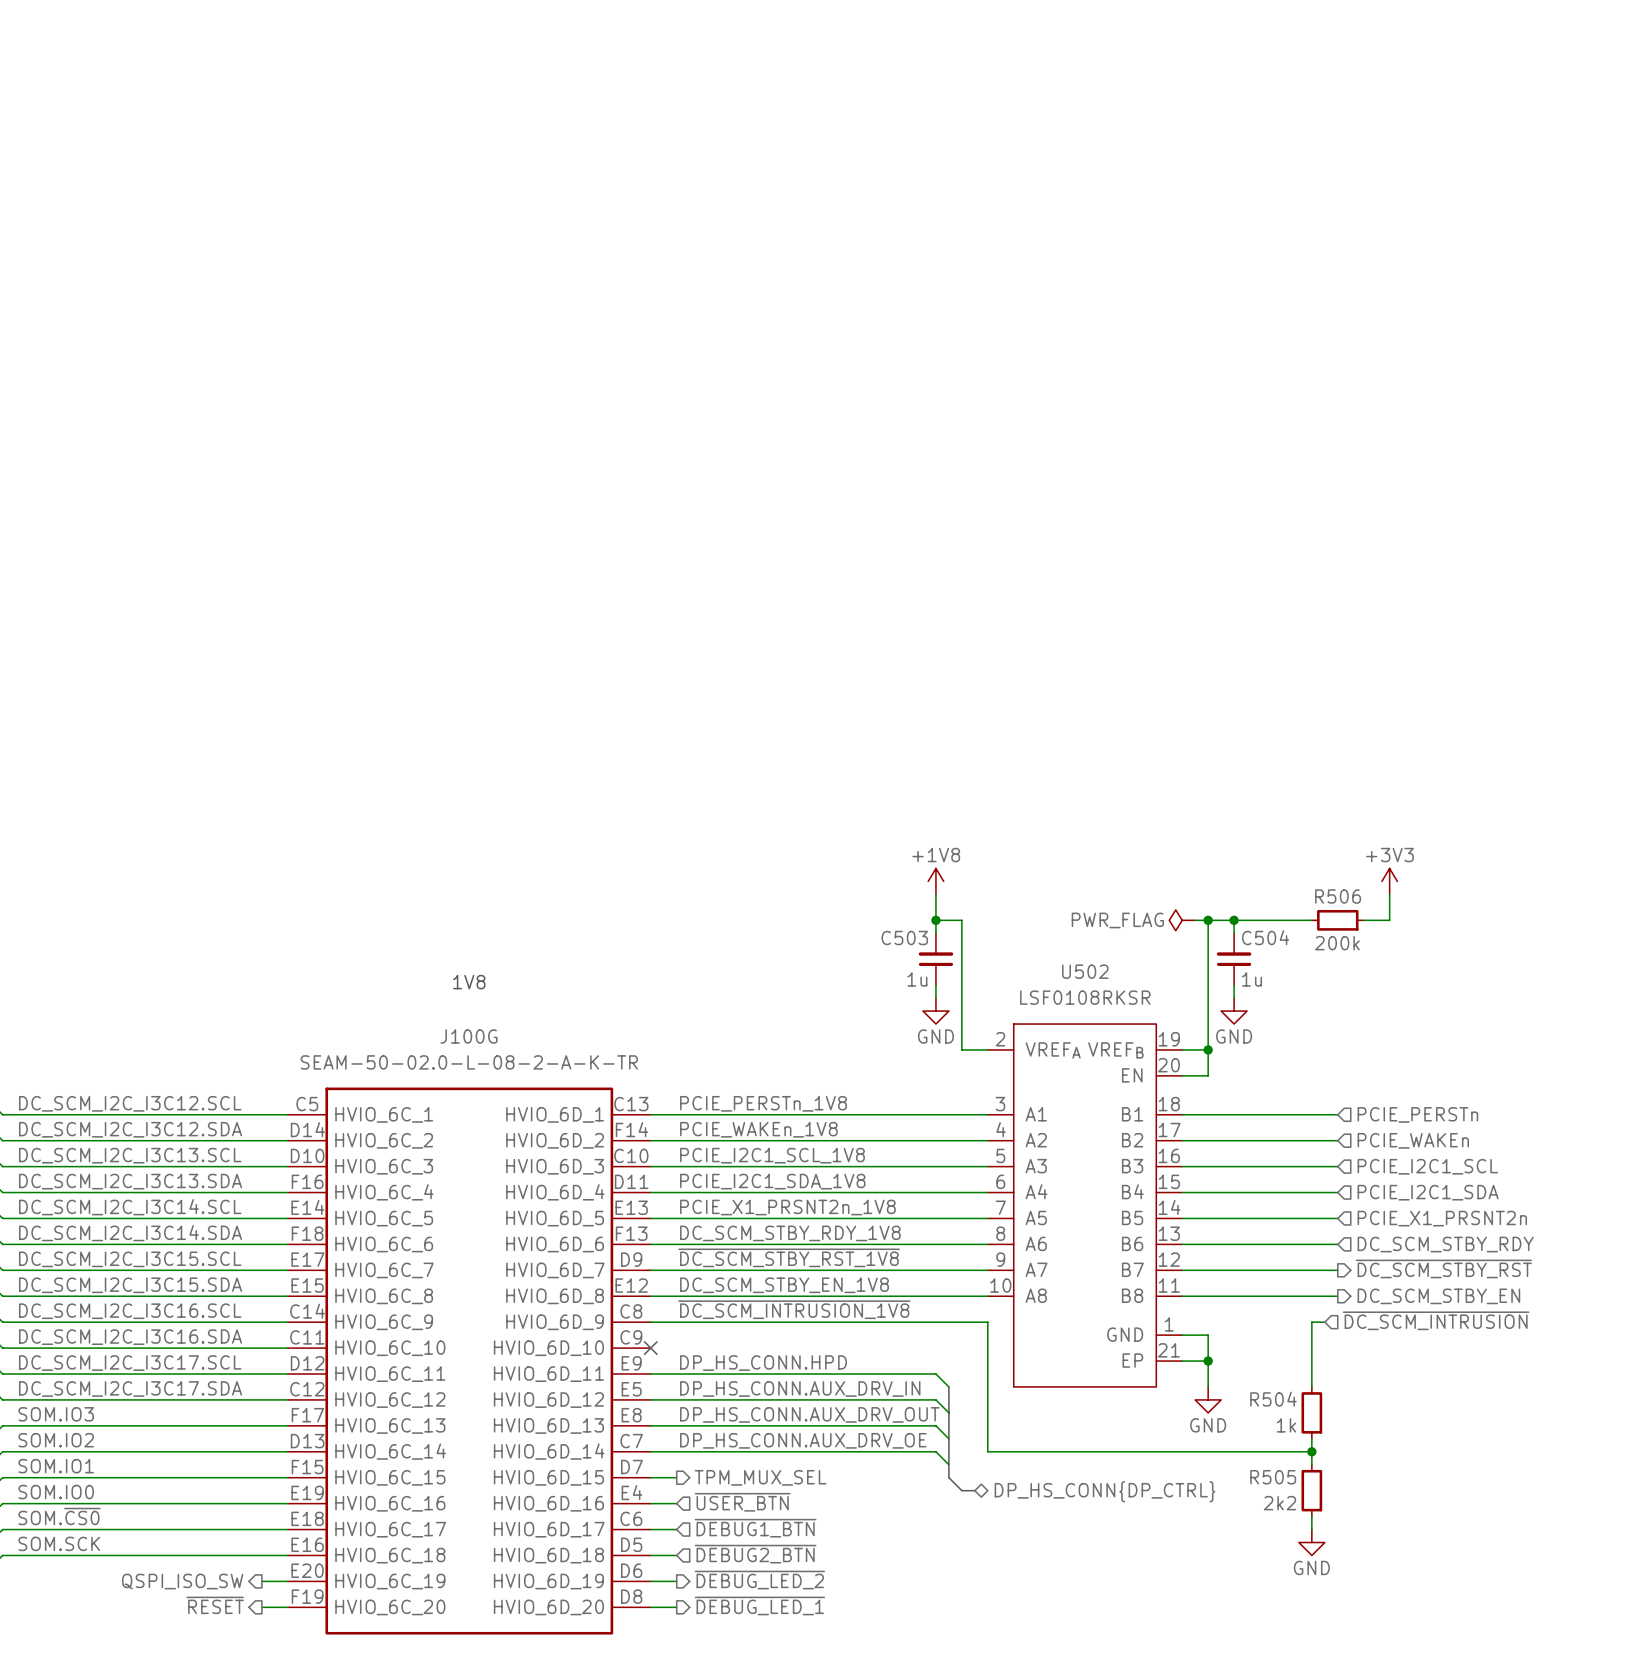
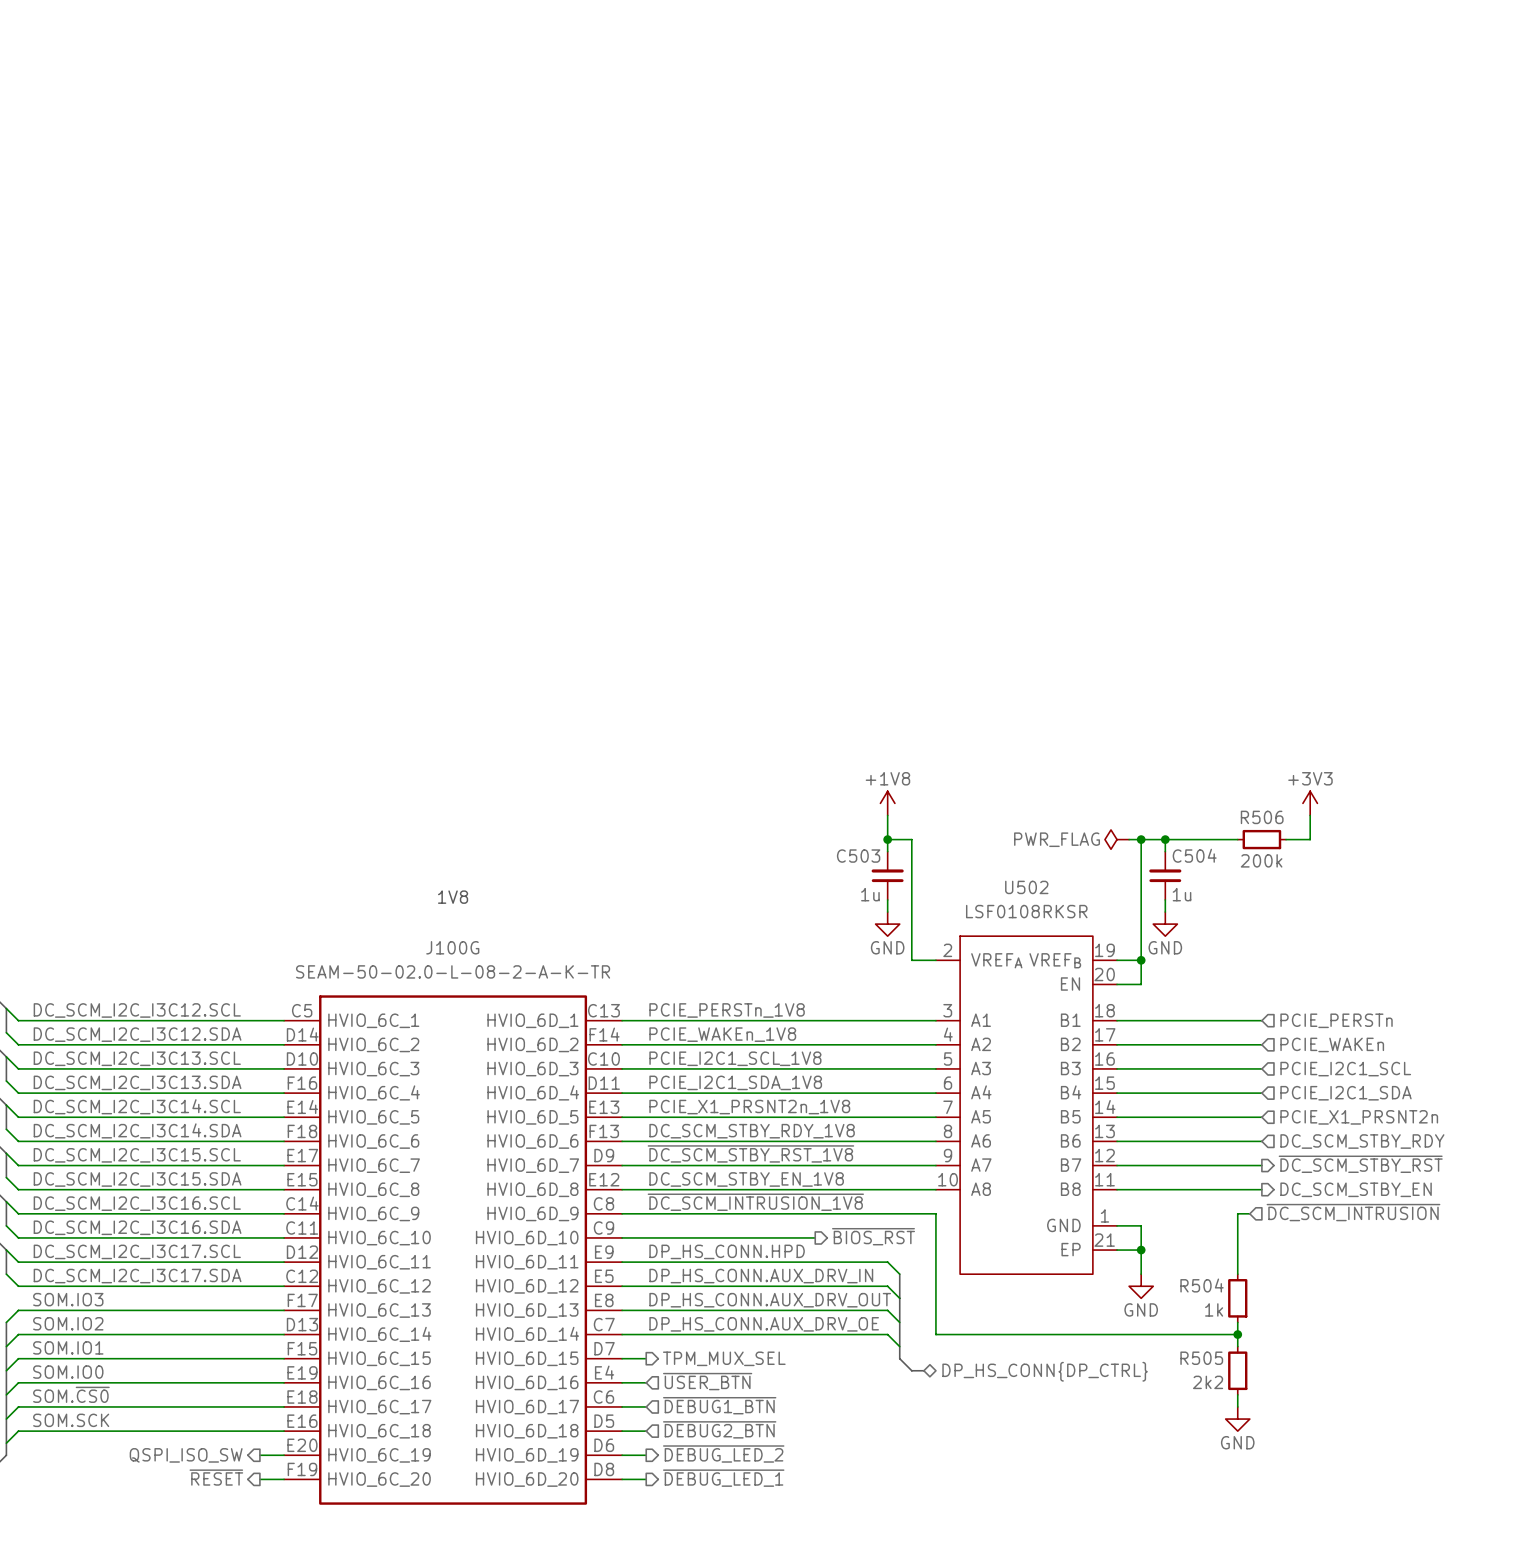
hierarchical label: none -> ~{BIOS_RST} (873, 1236)
wire: none -> (622, 1237) (815, 1237)
no-connect mark: (650, 1348) -> none

